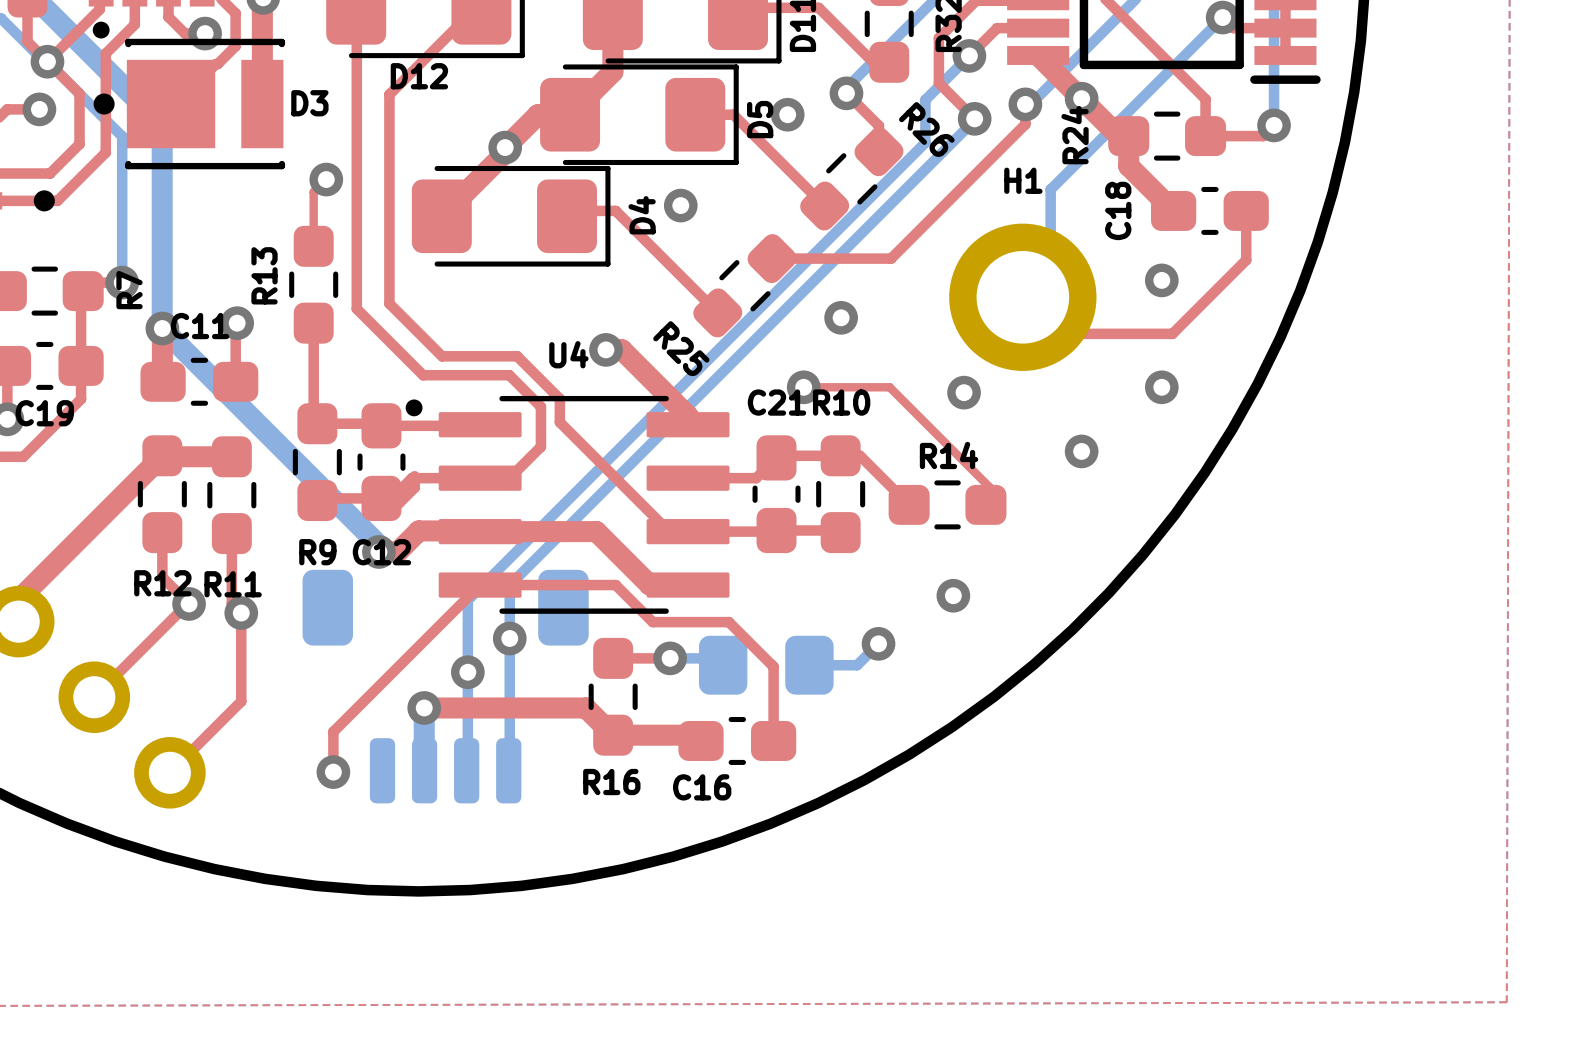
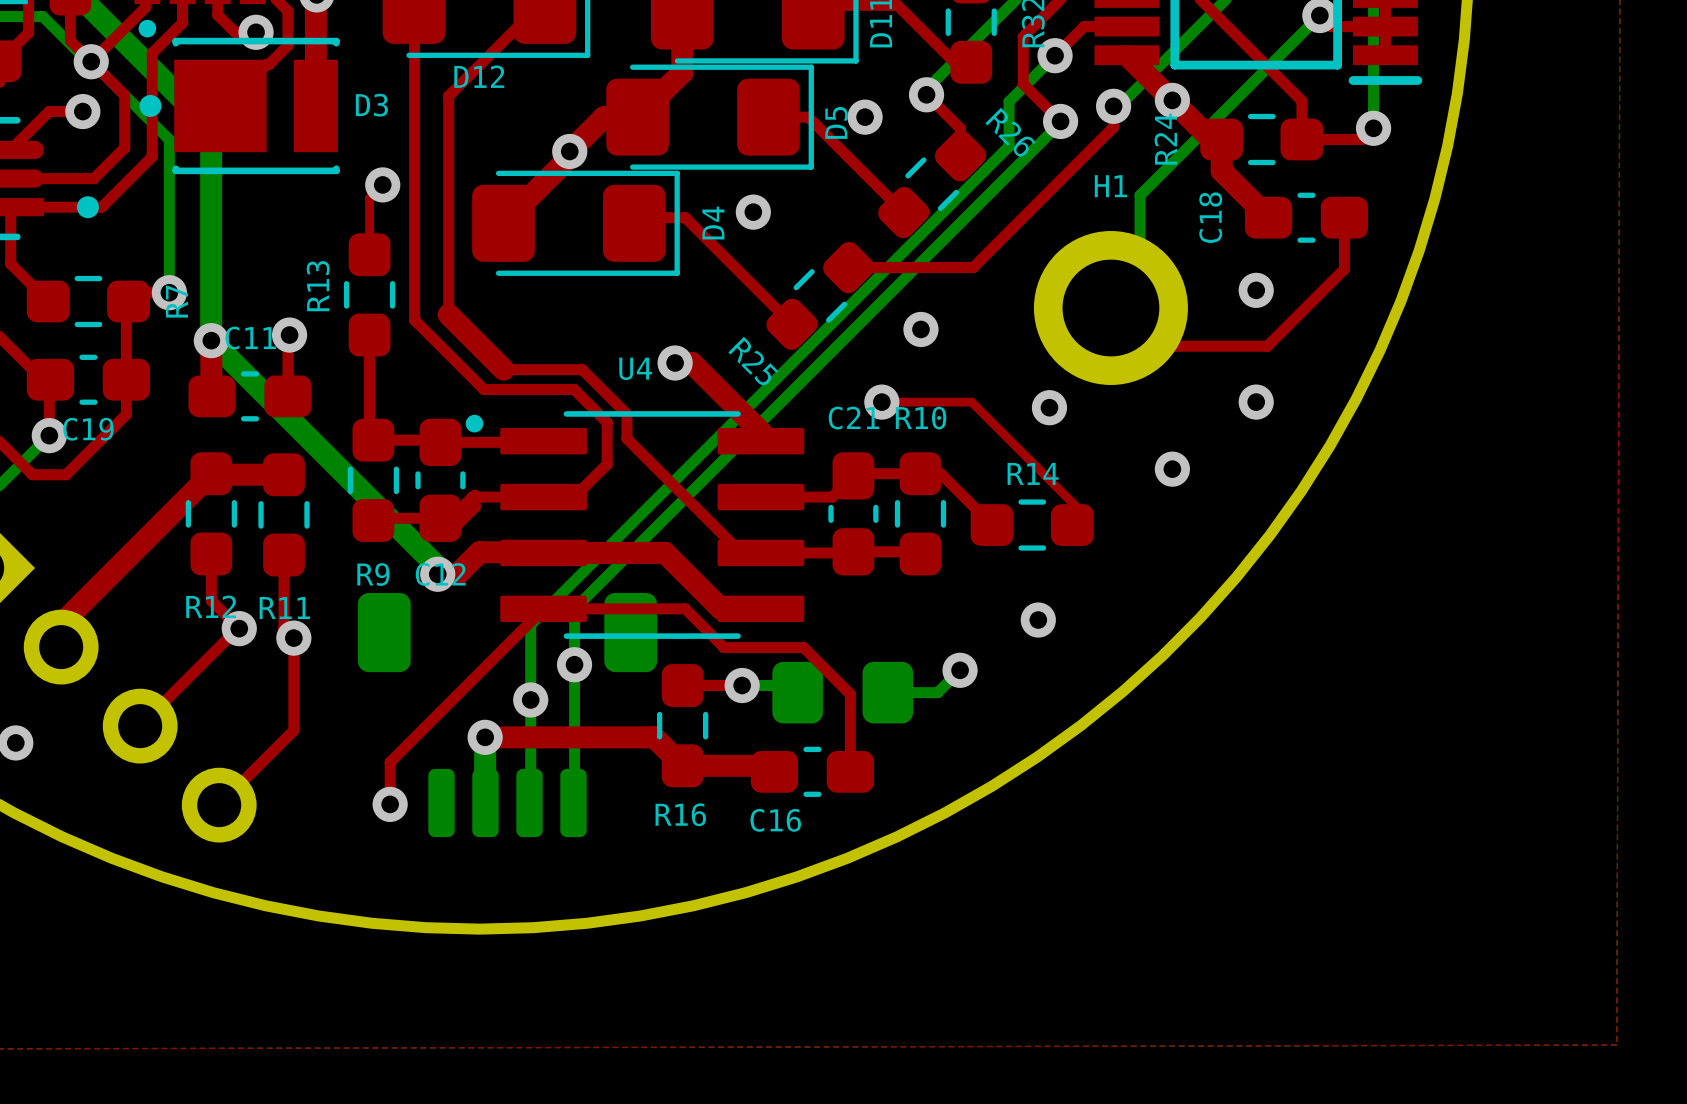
top track width: thin (389, 303) (442, 356) -> thick (448, 314) (503, 369)

